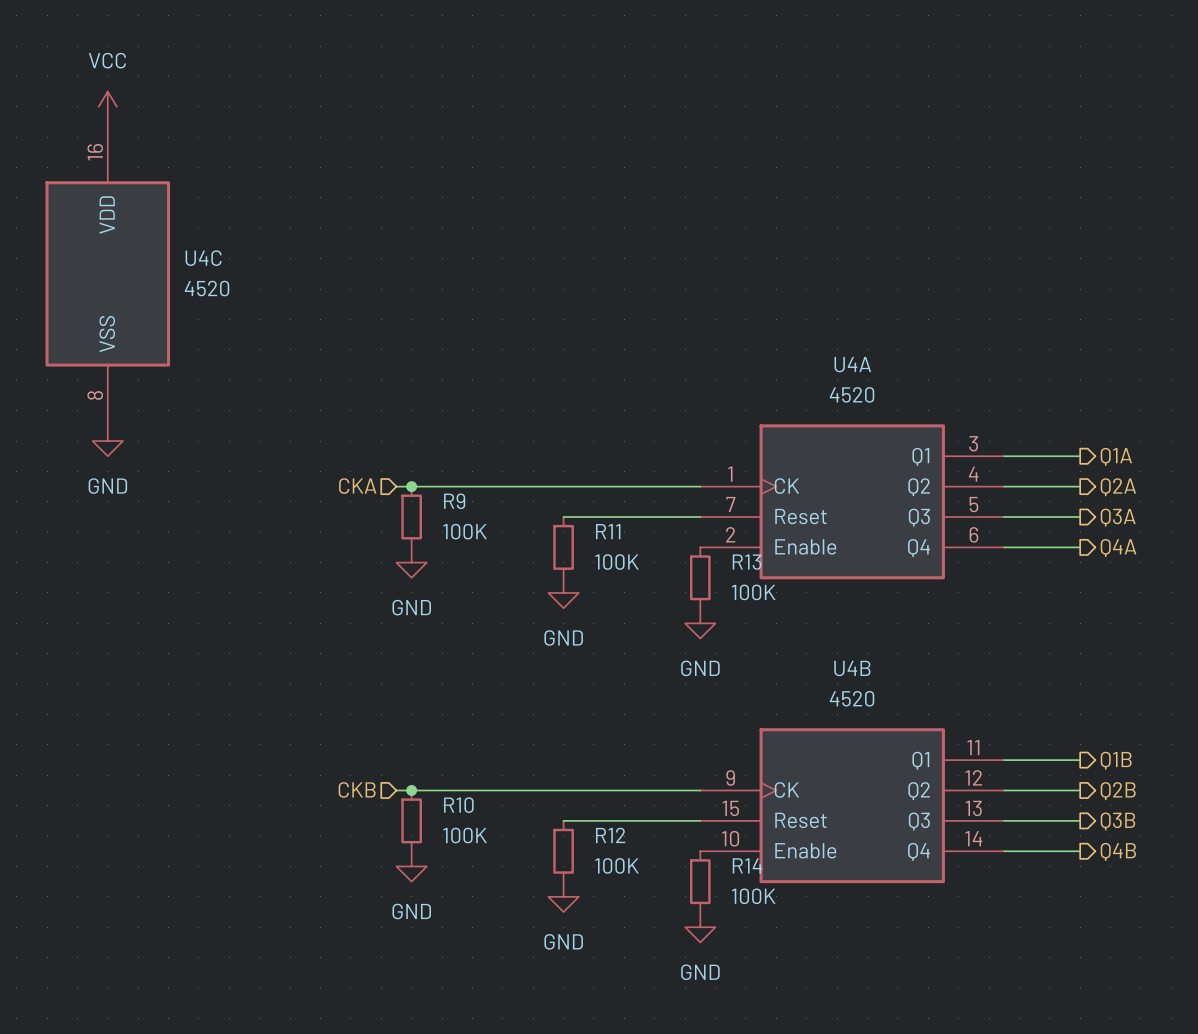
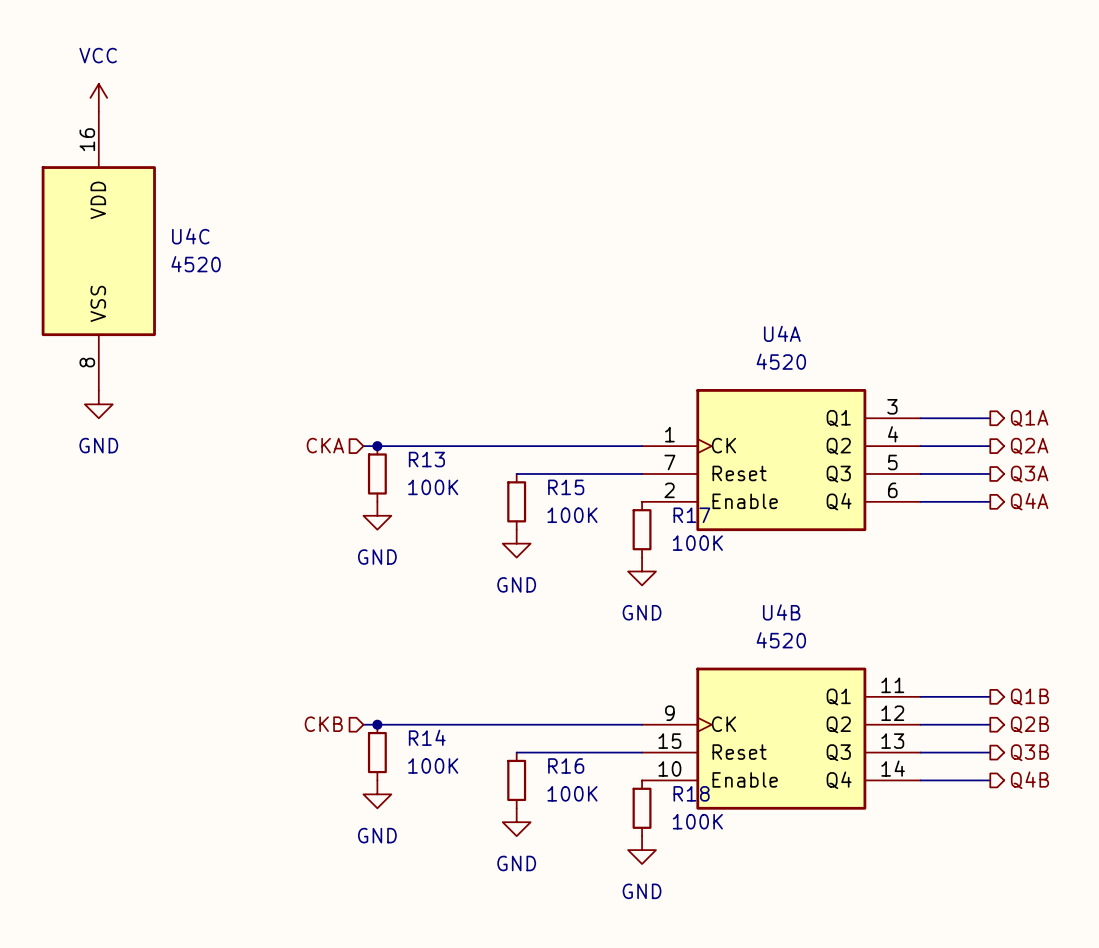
R9 name: R9 (454, 501) -> R13 (426, 459)
R11 name: R11 (608, 531) -> R15 (566, 487)
R13 name: R13 (747, 562) -> R17 (691, 515)
R10 name: R10 (458, 805) -> R14 (427, 737)
R12 name: R12 (610, 835) -> R16 (566, 765)
R14 name: R14 (747, 865) -> R18 (691, 793)

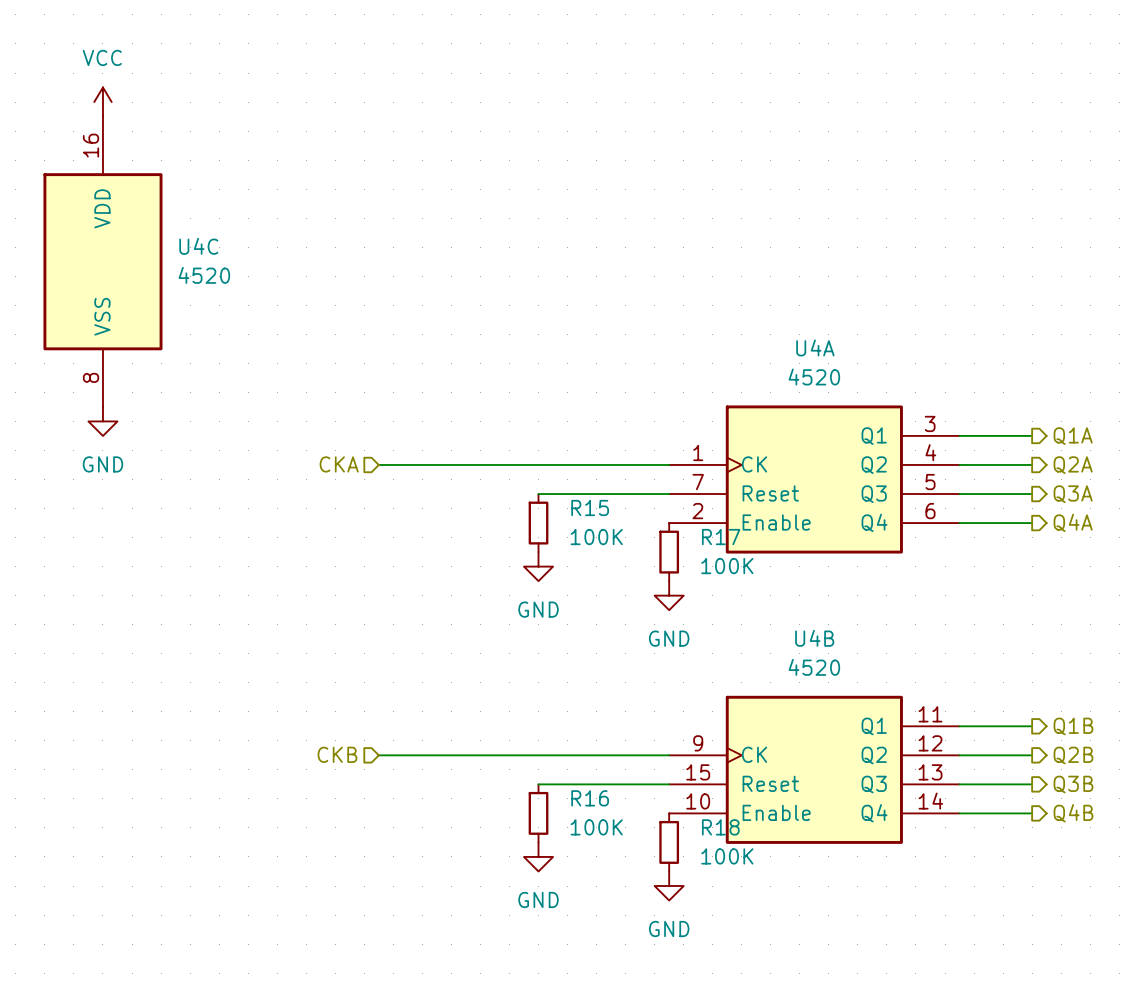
junction: (377, 446) -> none
R13: 100K (377, 473) -> none
power symbol: GND (377, 515) -> none
junction: (377, 724) -> none
R14: 100K (377, 752) -> none
power symbol: GND (377, 794) -> none

